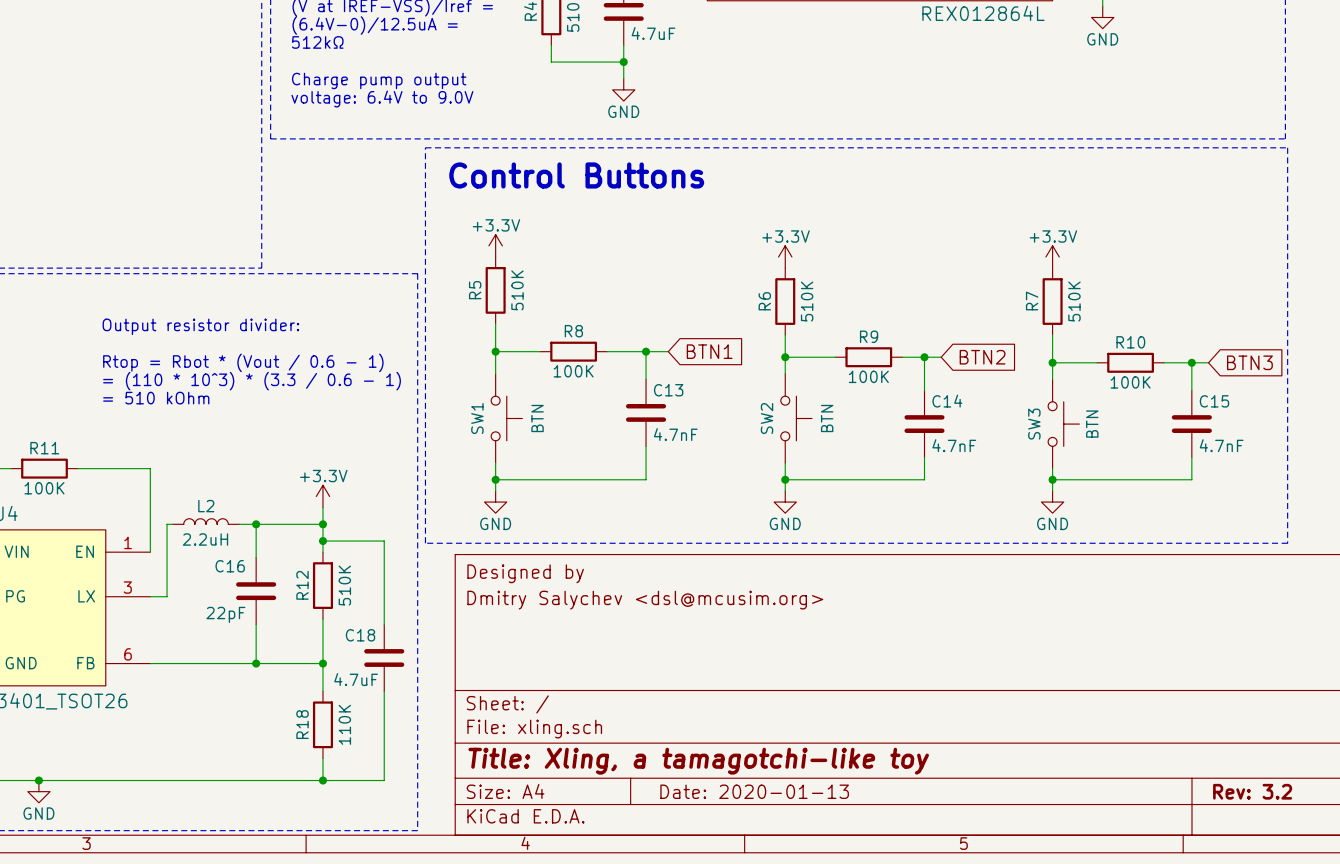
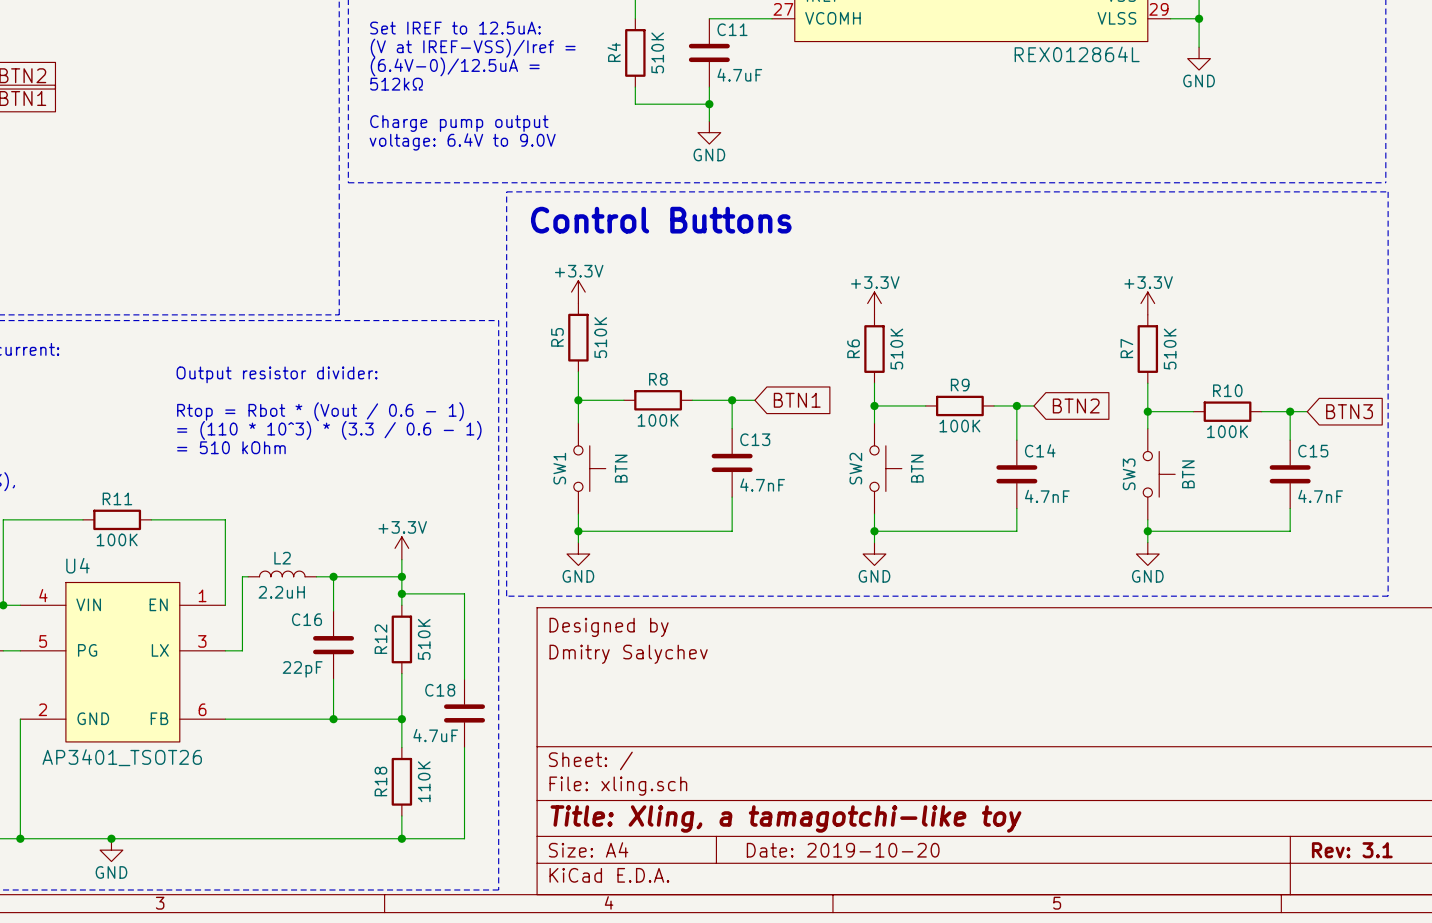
title block: Dmitry Salychev <dsl@mcusim.org> (645, 600) -> Dmitry Salychev (628, 654)
title block: Date: 2020-01-13 (754, 791) -> Date: 2019-10-20 (843, 850)
title block: Rev: 3.2 (1252, 791) -> Rev: 3.1 (1352, 850)

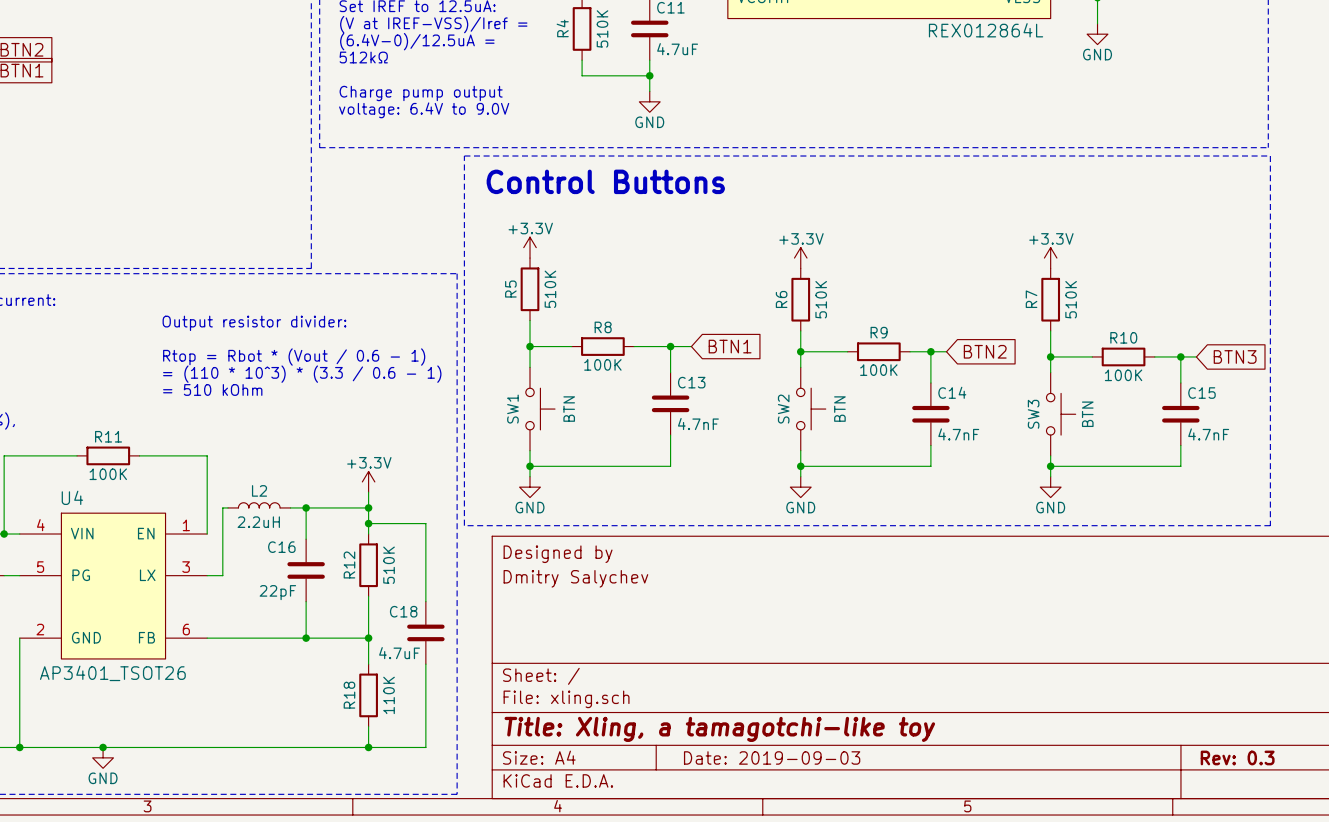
title block: Date: 2019-10-20 (843, 850) -> Date: 2019-09-03 (772, 757)
title block: Rev: 3.1 (1352, 850) -> Rev: 0.3 (1237, 757)

